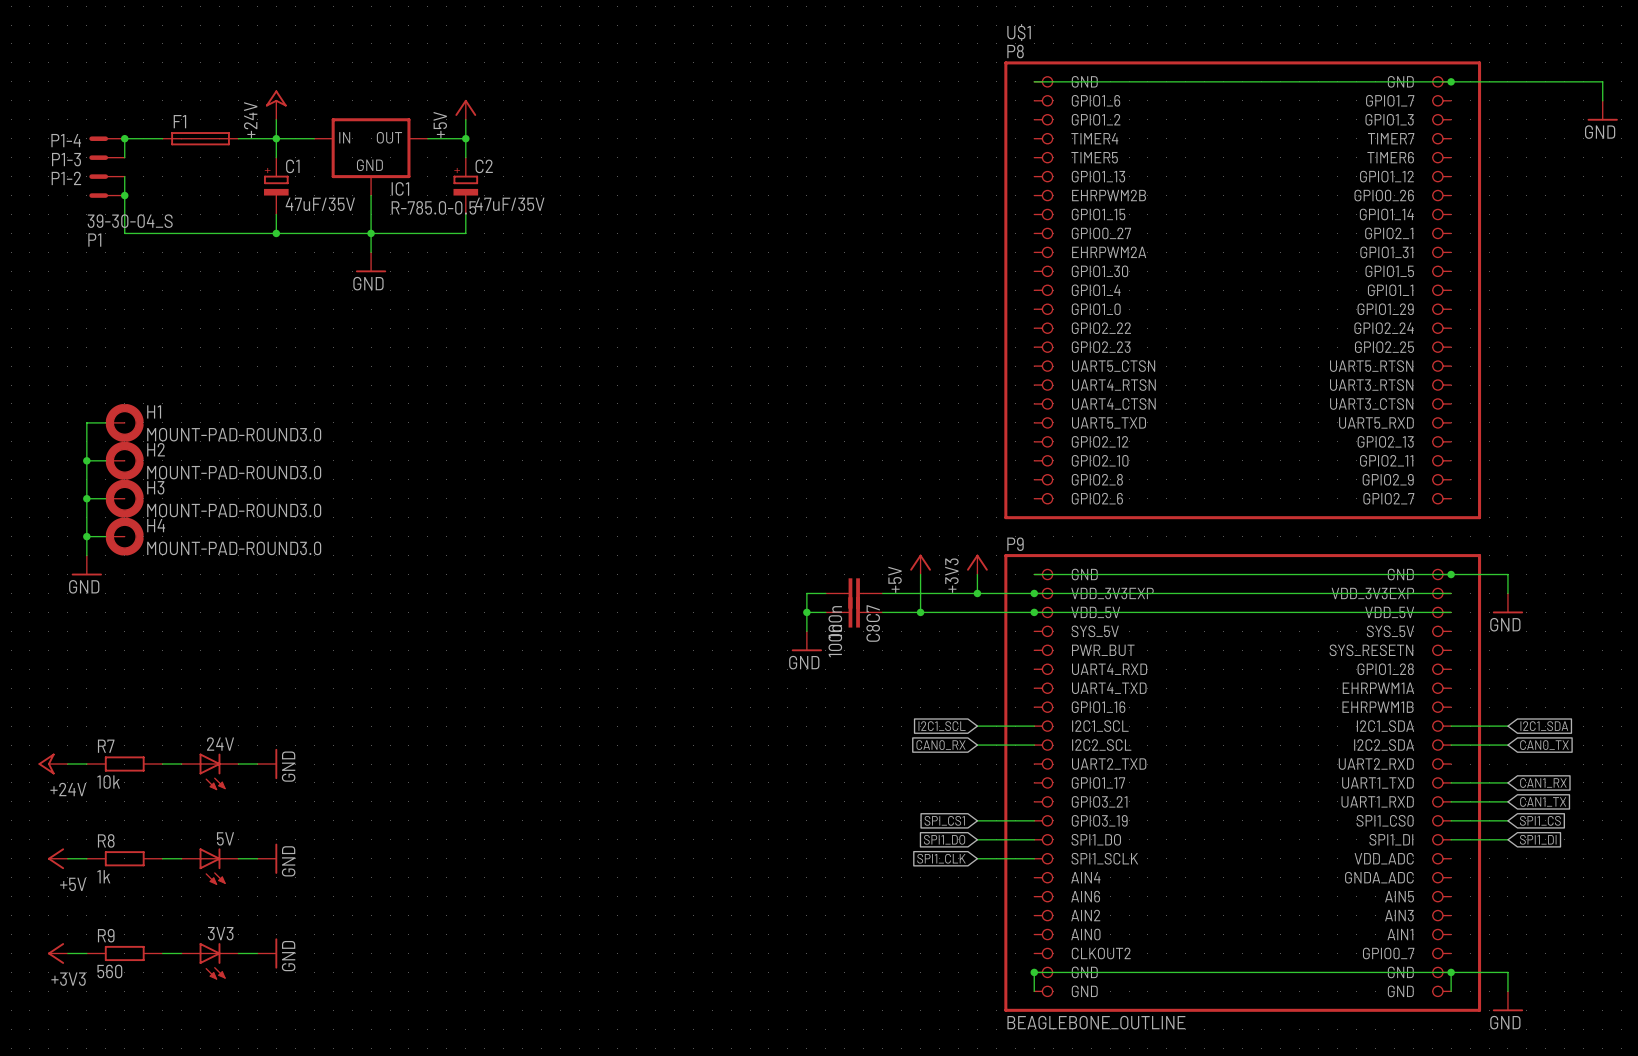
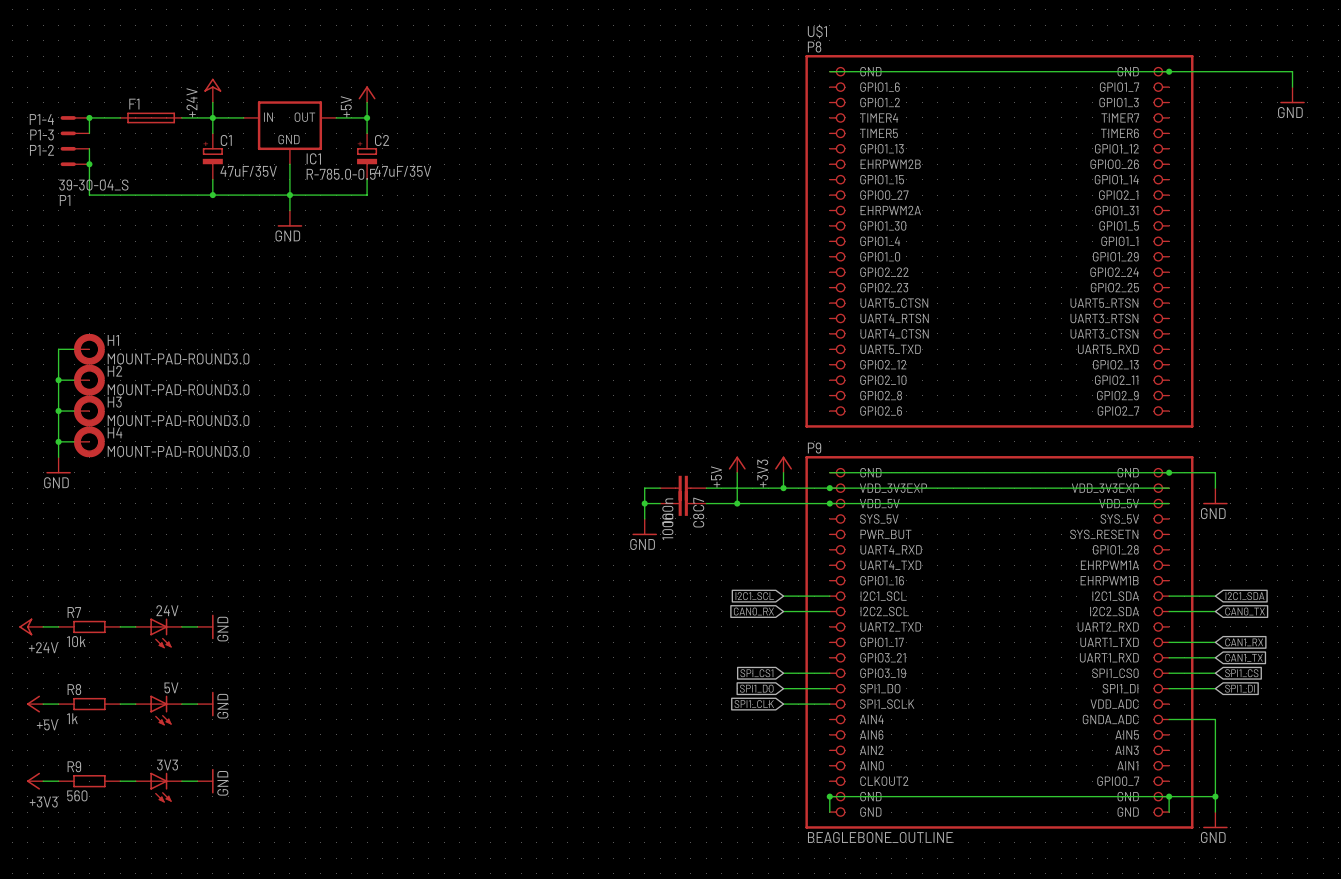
wire: none -> (1169, 719) (1215, 719) (1215, 796)
junction: none -> (1215, 796)

